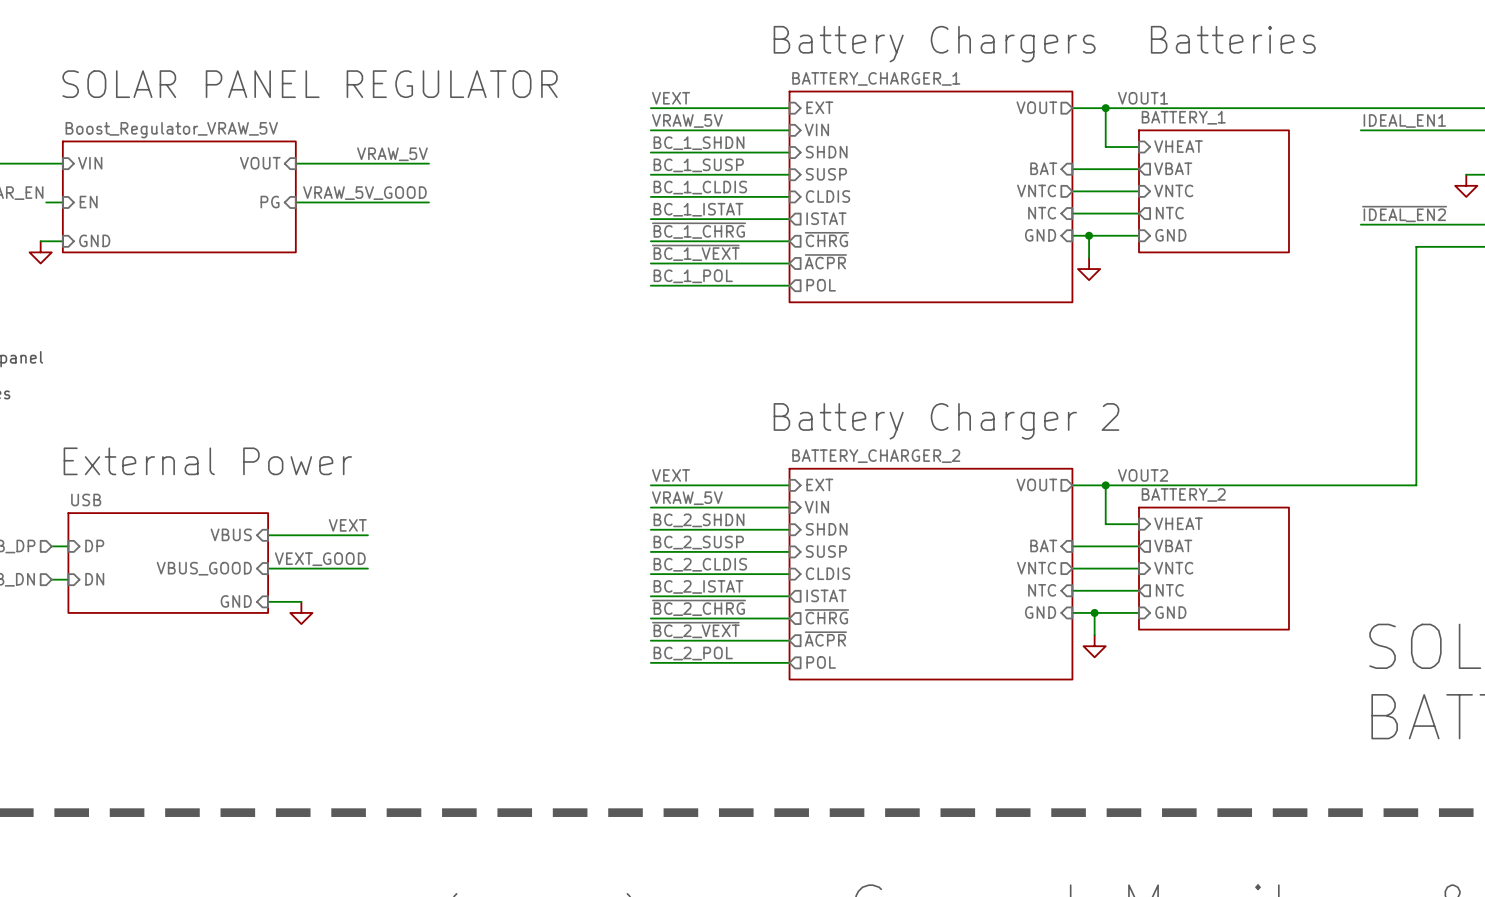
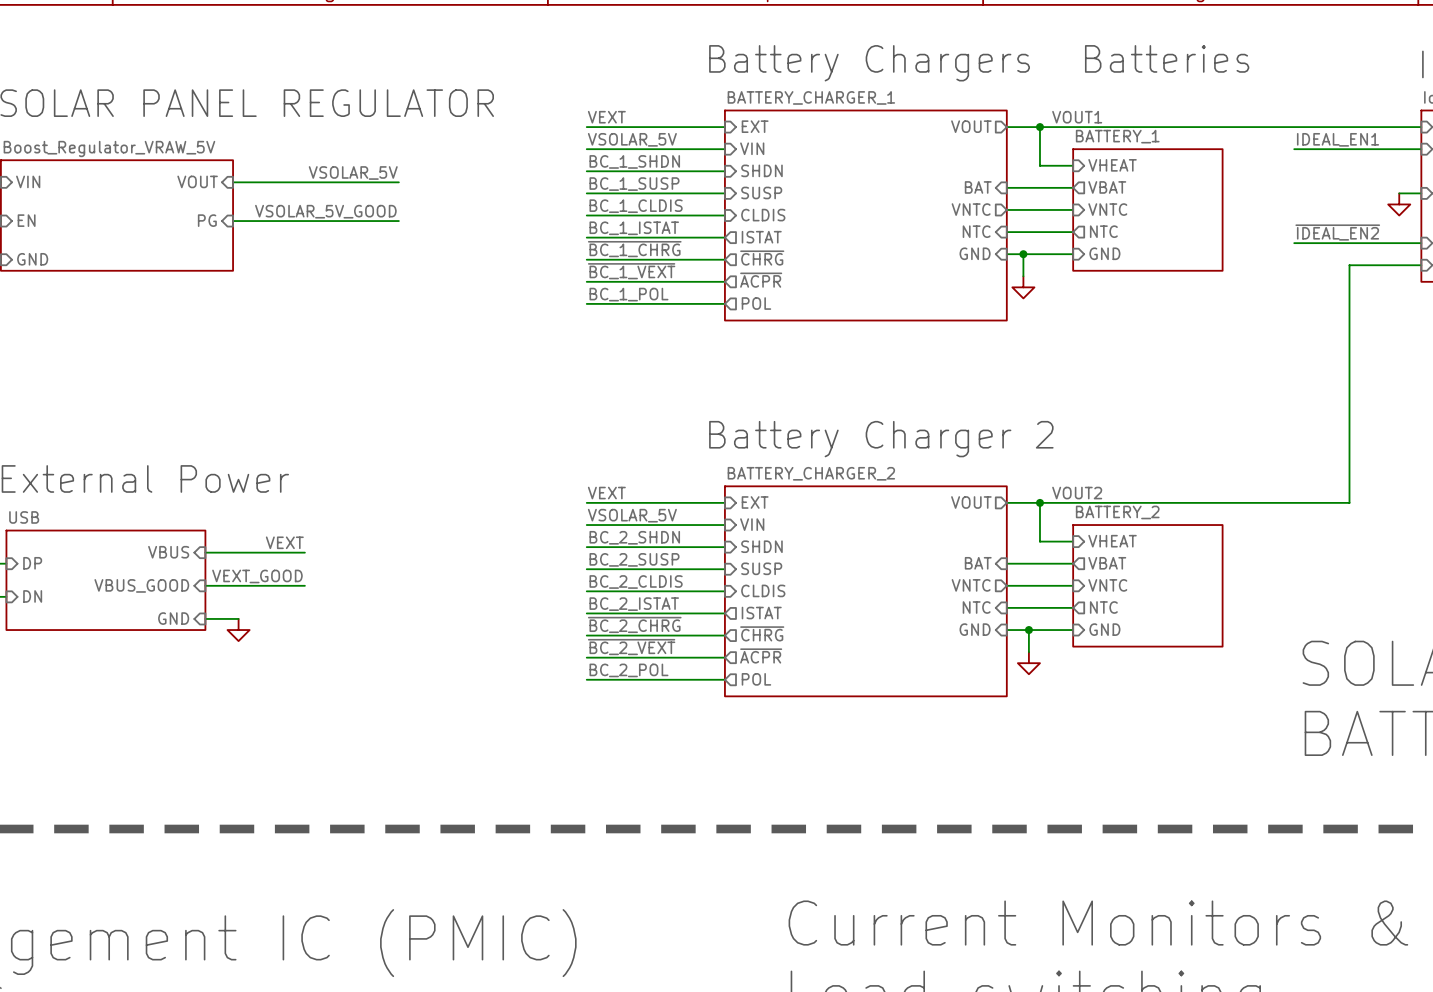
label: VRAW_5V (687, 120) -> VSOLAR_5V (632, 139)
label: VRAW_5V (392, 154) -> VSOLAR_5V (353, 173)
wire: none -> (365, 182) (398, 182)
label: VRAW_5V_GOOD (364, 193) -> VSOLAR_5V_GOOD (325, 211)
wire: none -> (365, 221) (398, 221)
label: VRAW_5V (687, 498) -> VSOLAR_5V (632, 515)

